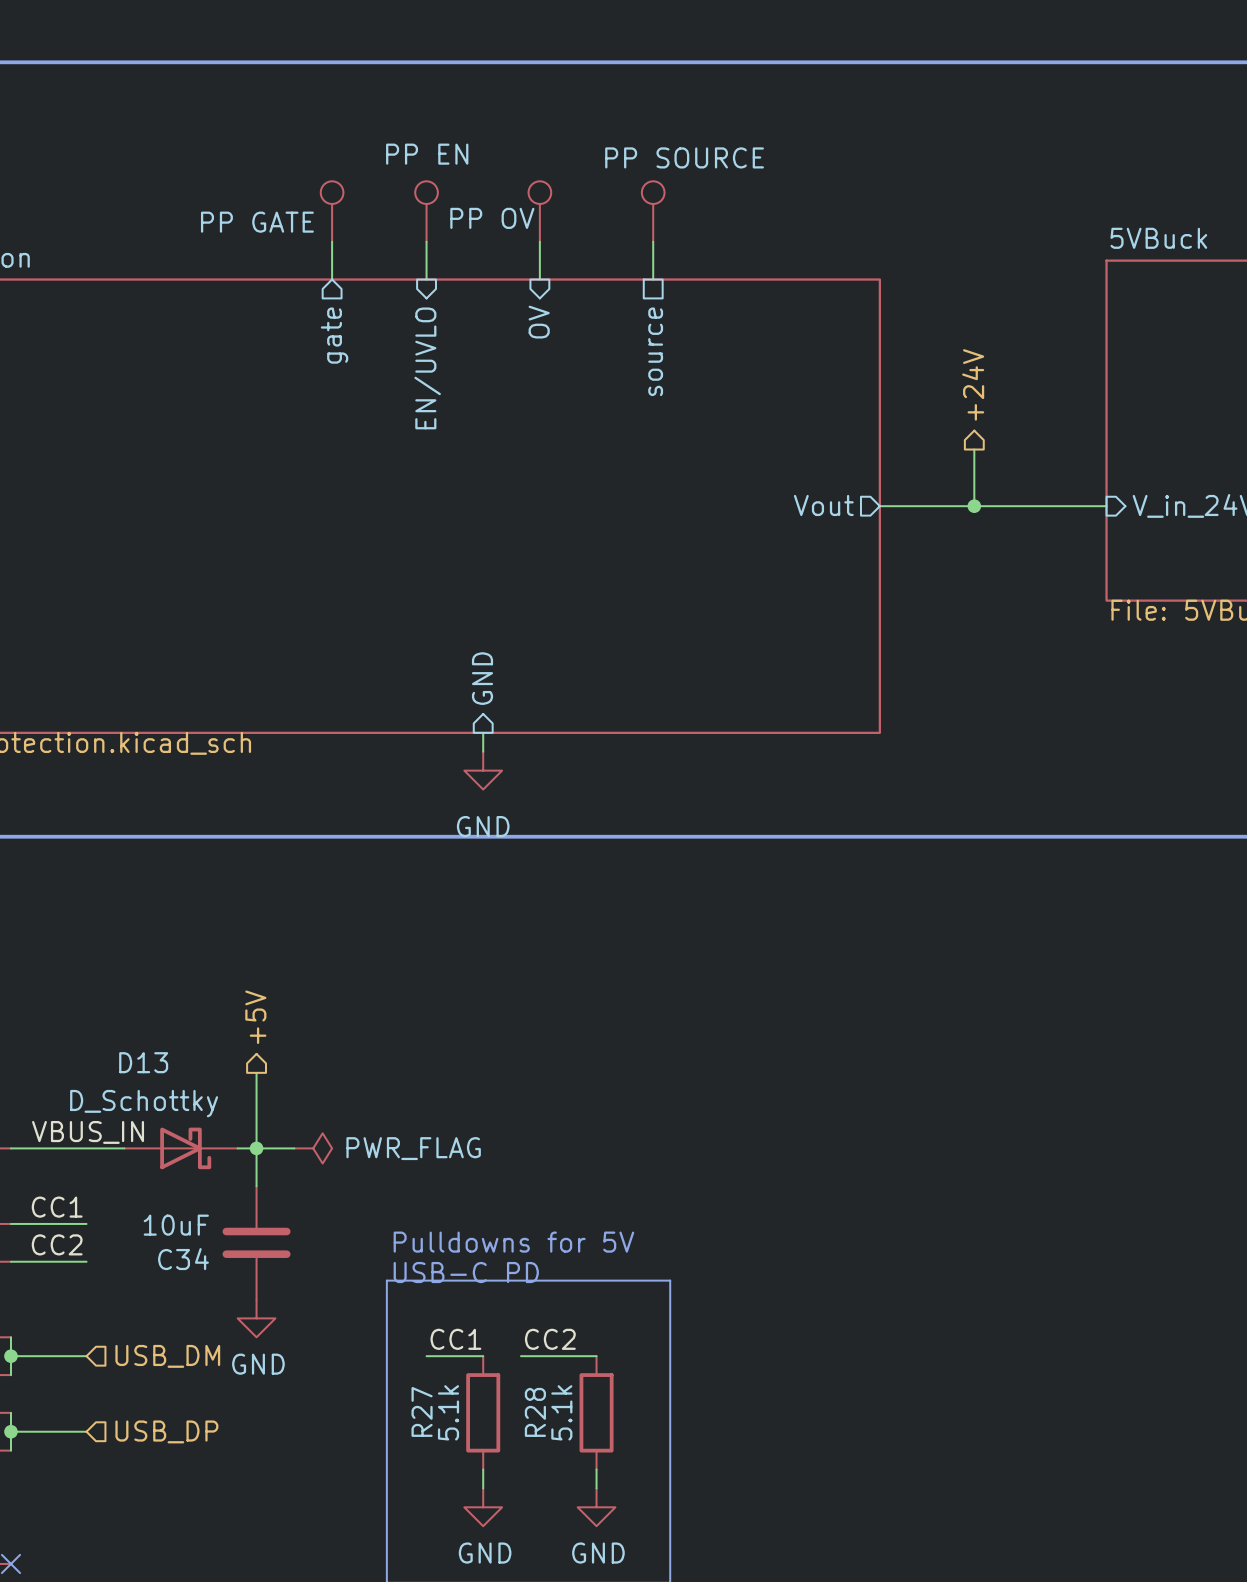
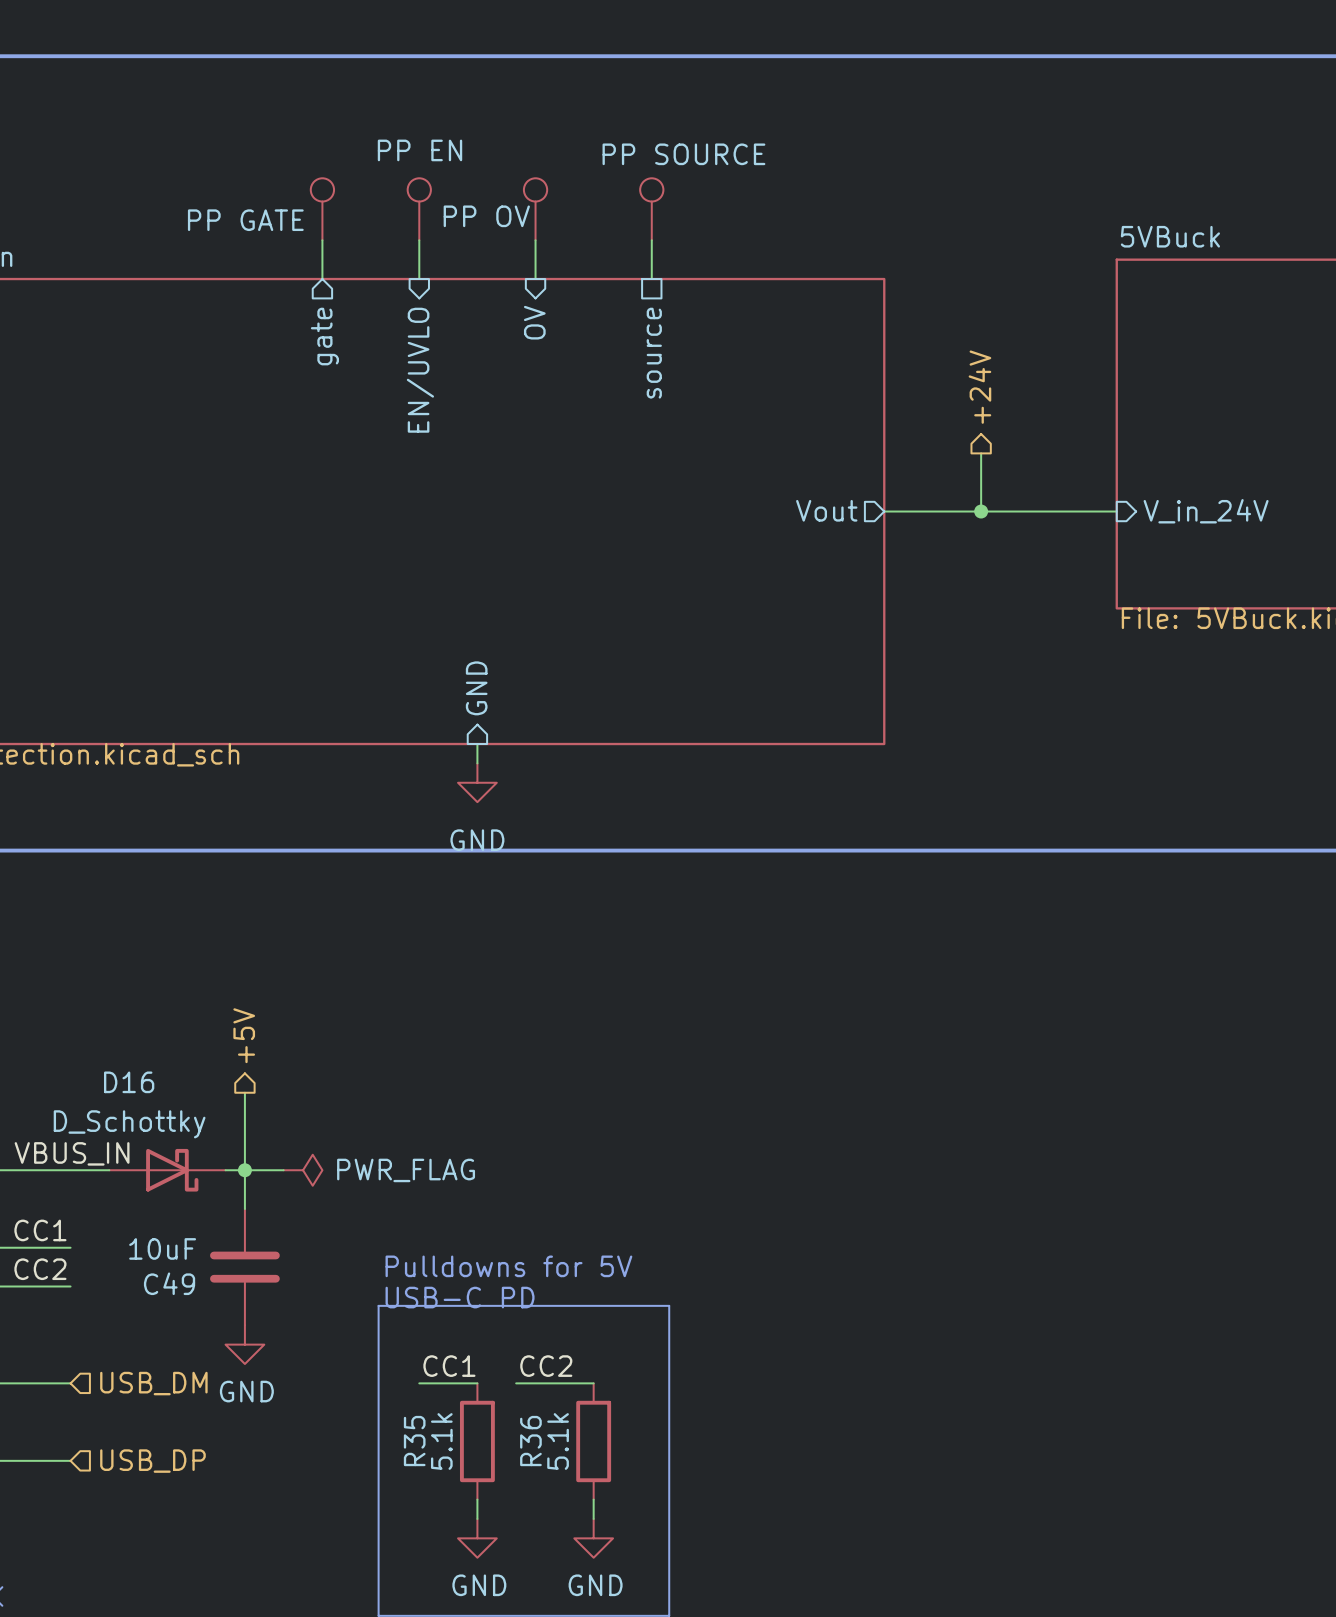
D13 name: D13 (143, 1062) -> D16 (129, 1082)
C34 name: C34 (183, 1259) -> C49 (169, 1283)
R27 name: R27 (422, 1411) -> R35 (414, 1441)
R28 name: R28 (535, 1412) -> R36 (530, 1441)

